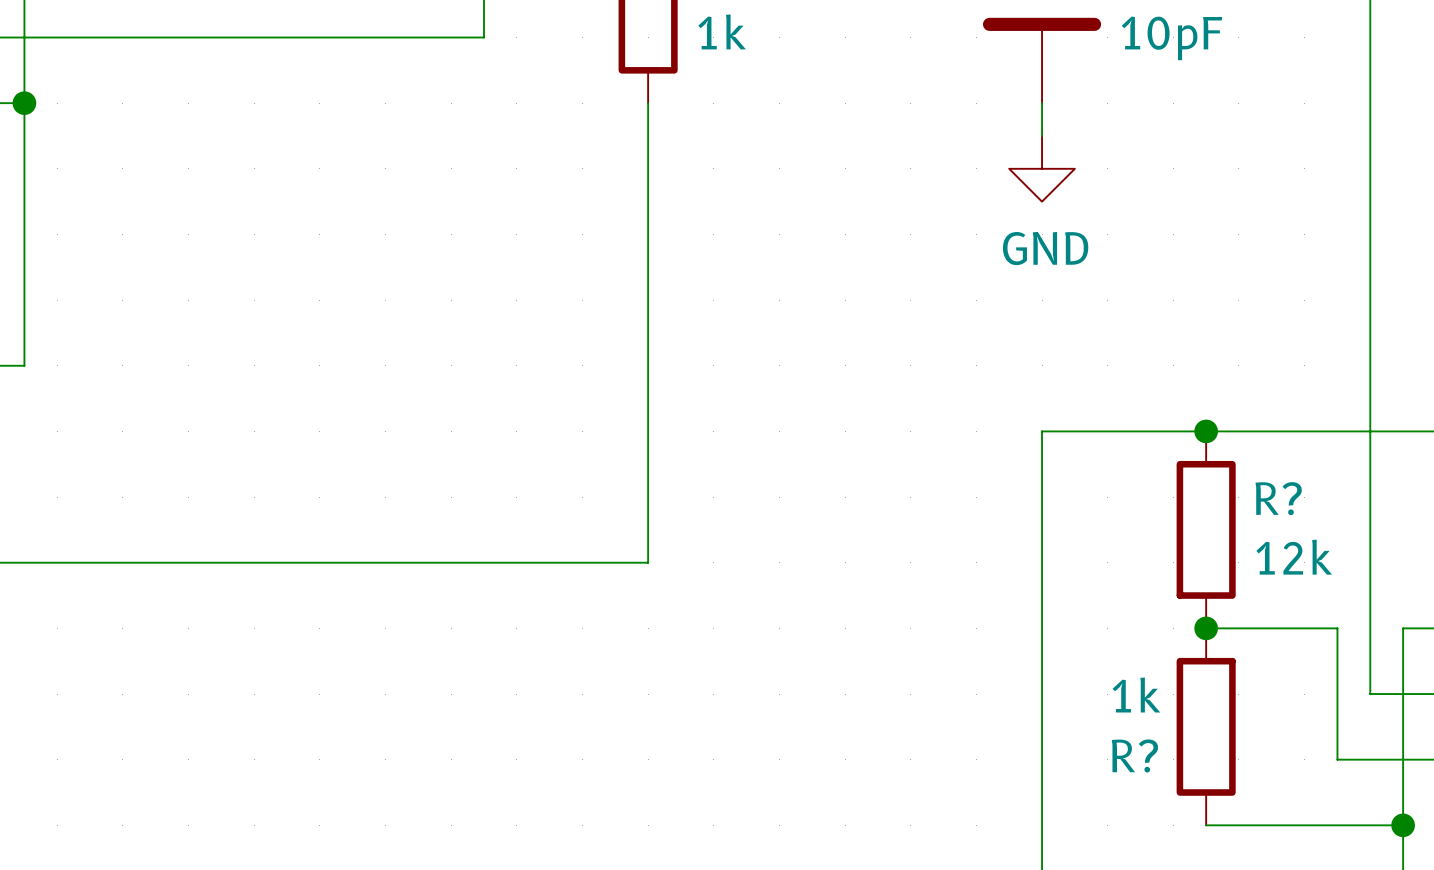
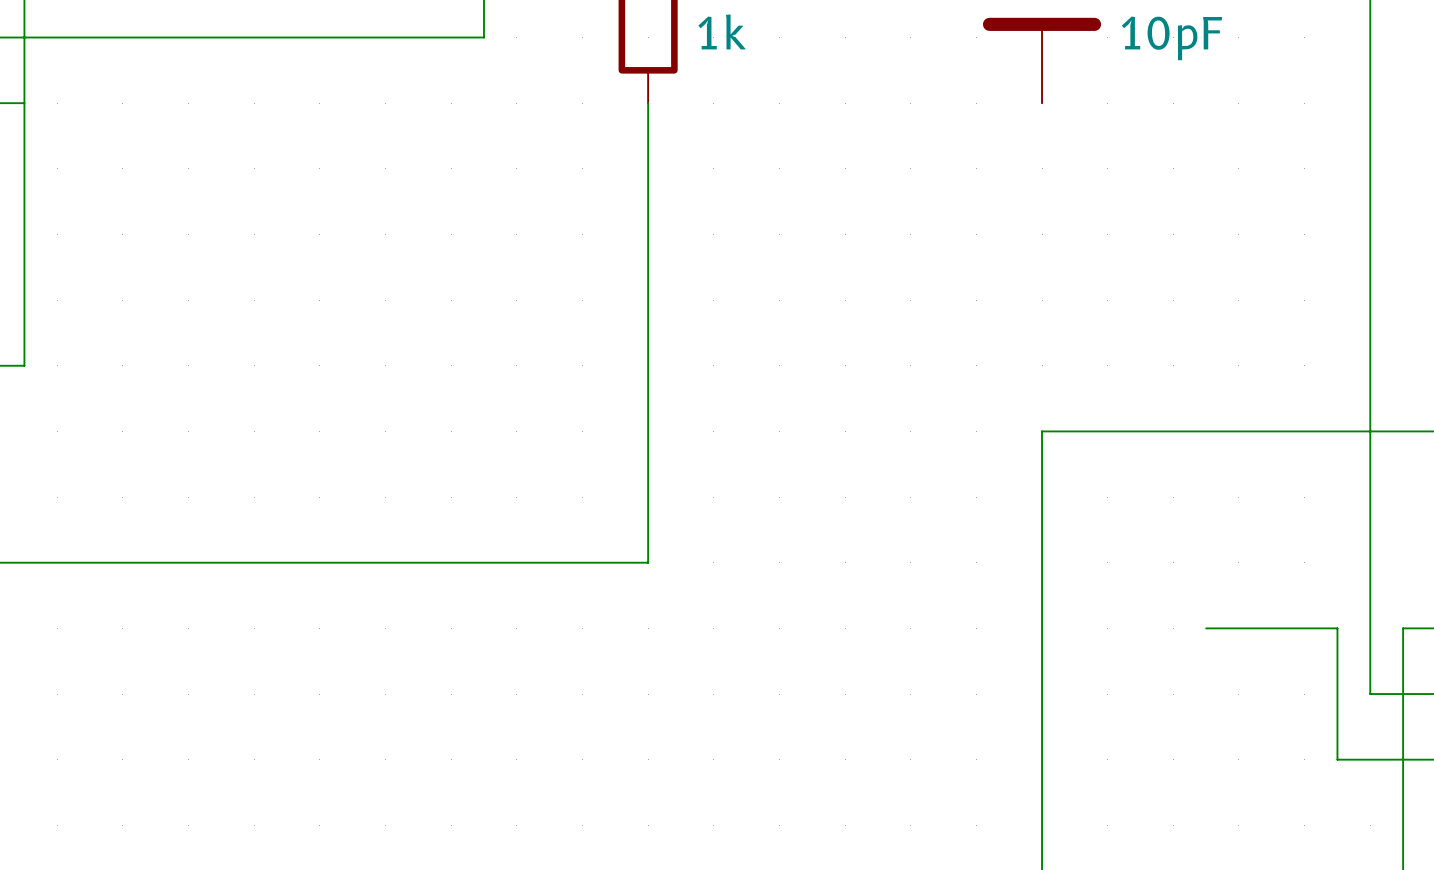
junction: (24, 103) -> none
wire: (1042, 103) (1042, 135) -> none
power symbol: GND (1042, 168) -> none
junction: (1206, 431) -> none
R?: 12k (1206, 529) -> none
junction: (1206, 628) -> none
R?: 1k (1206, 726) -> none
wire: (1206, 825) (1403, 825) -> none
junction: (1403, 825) -> none

